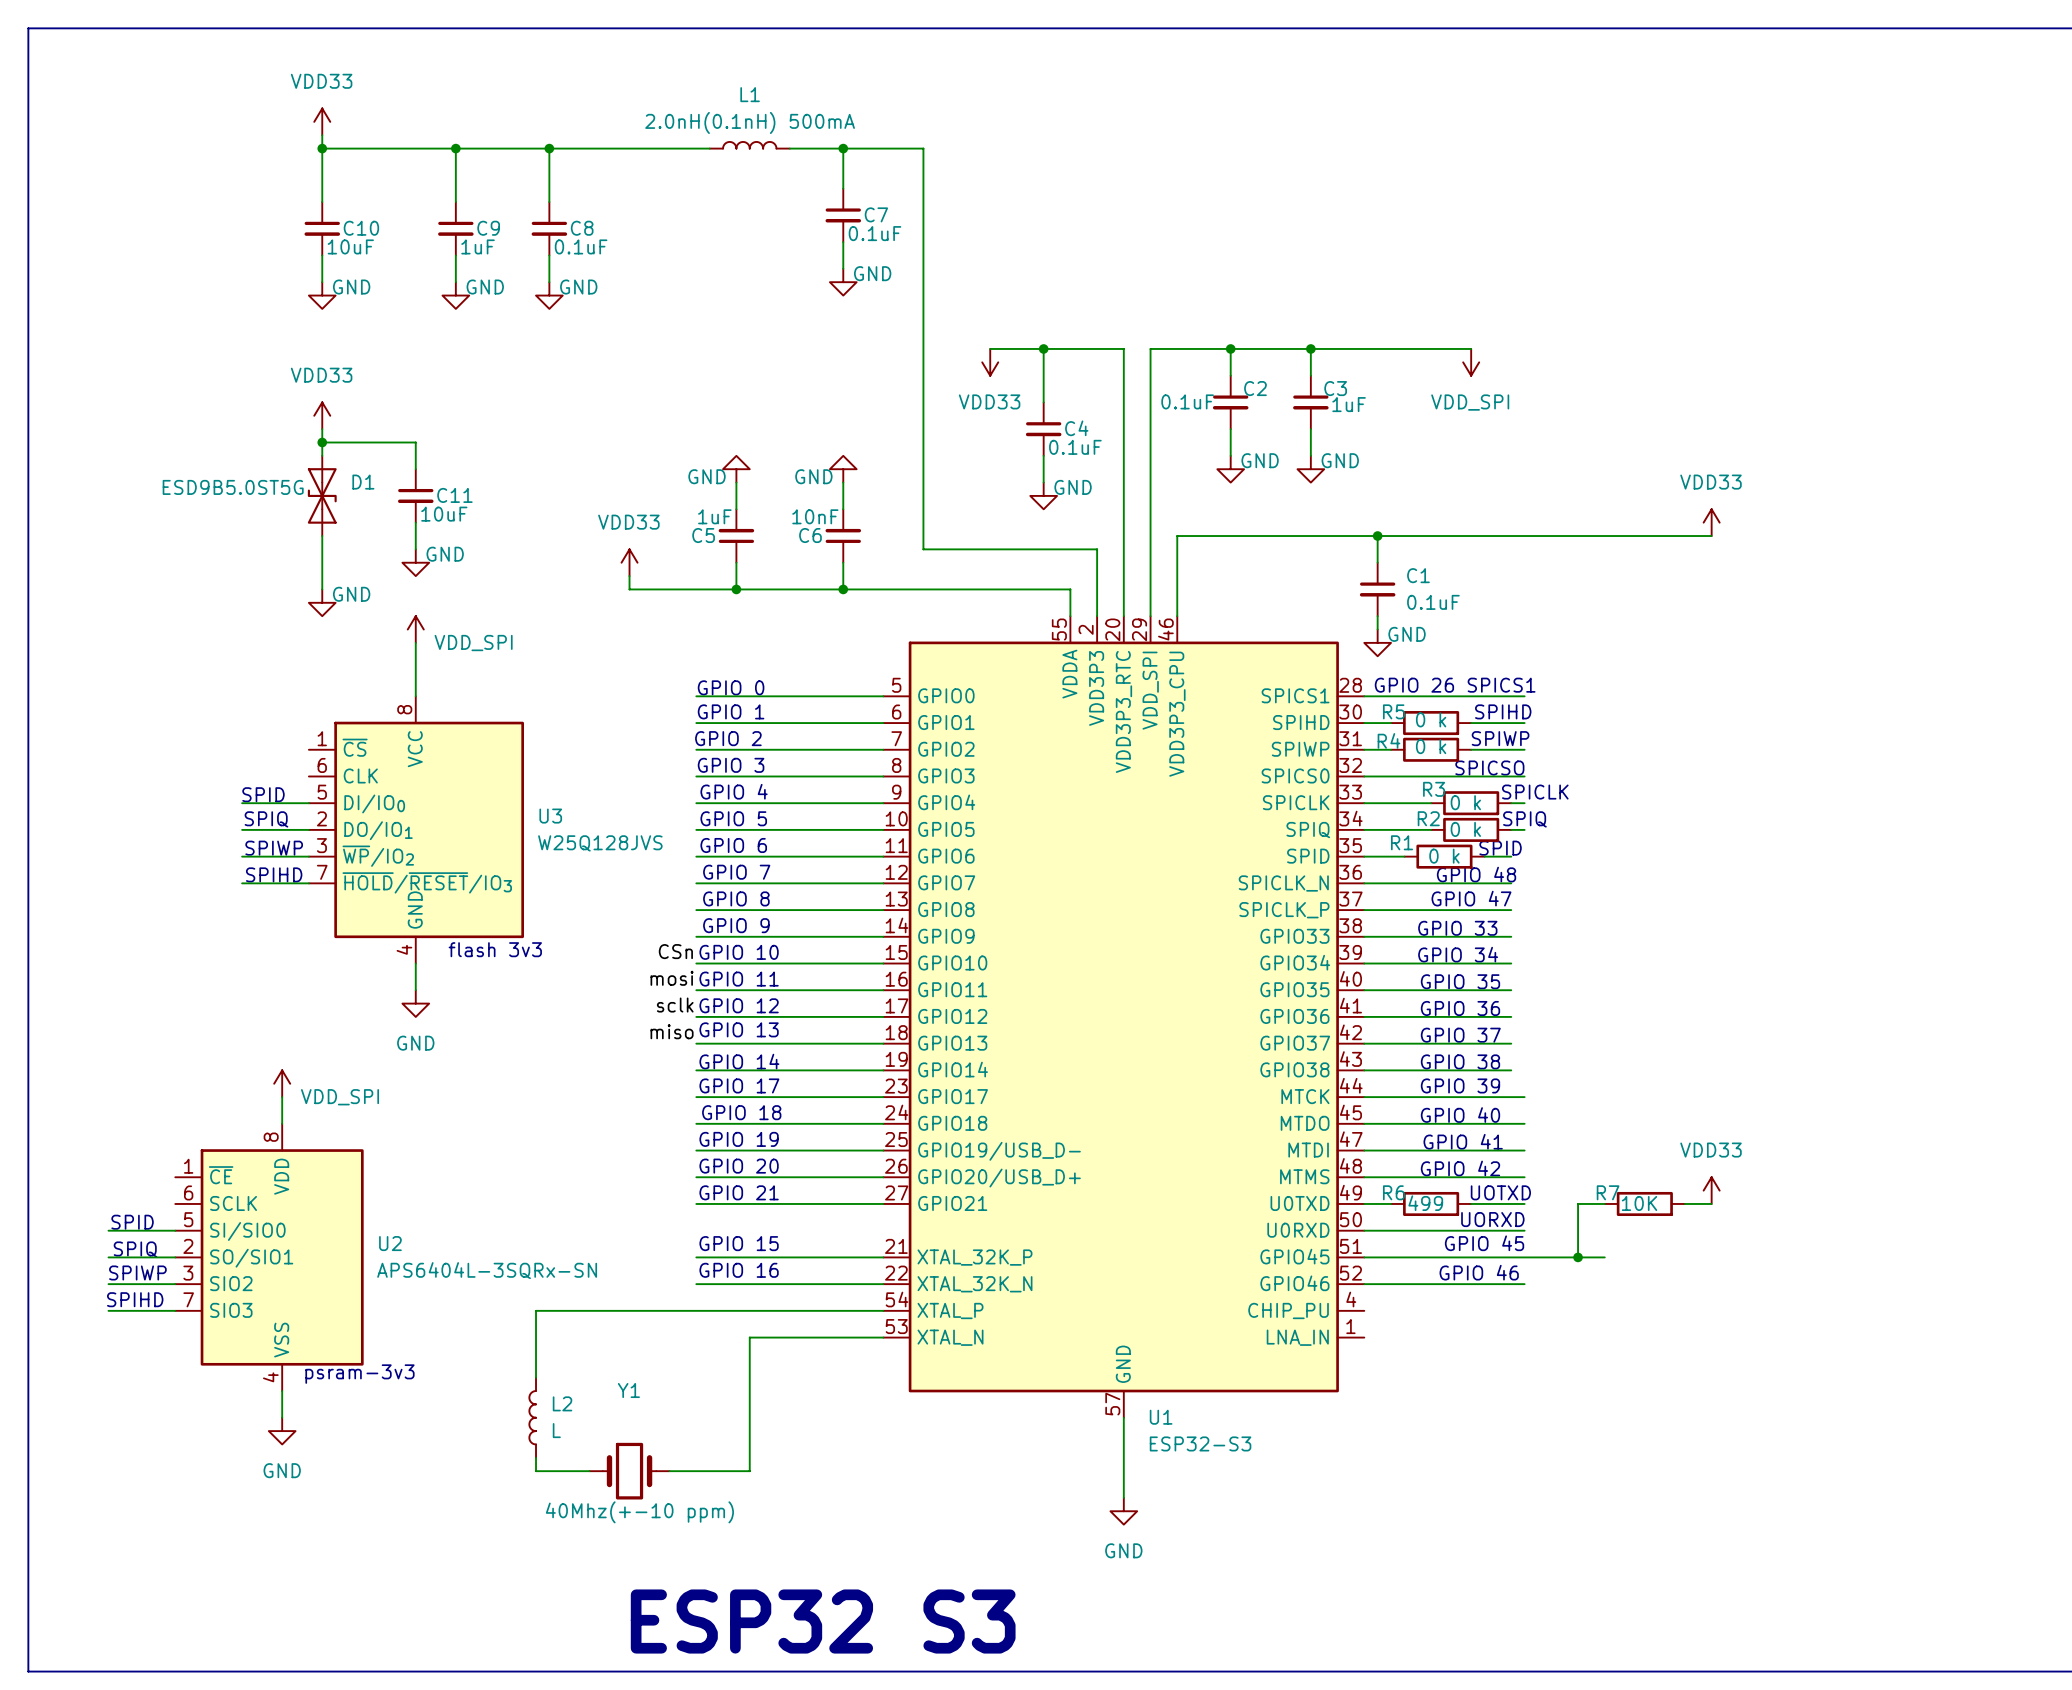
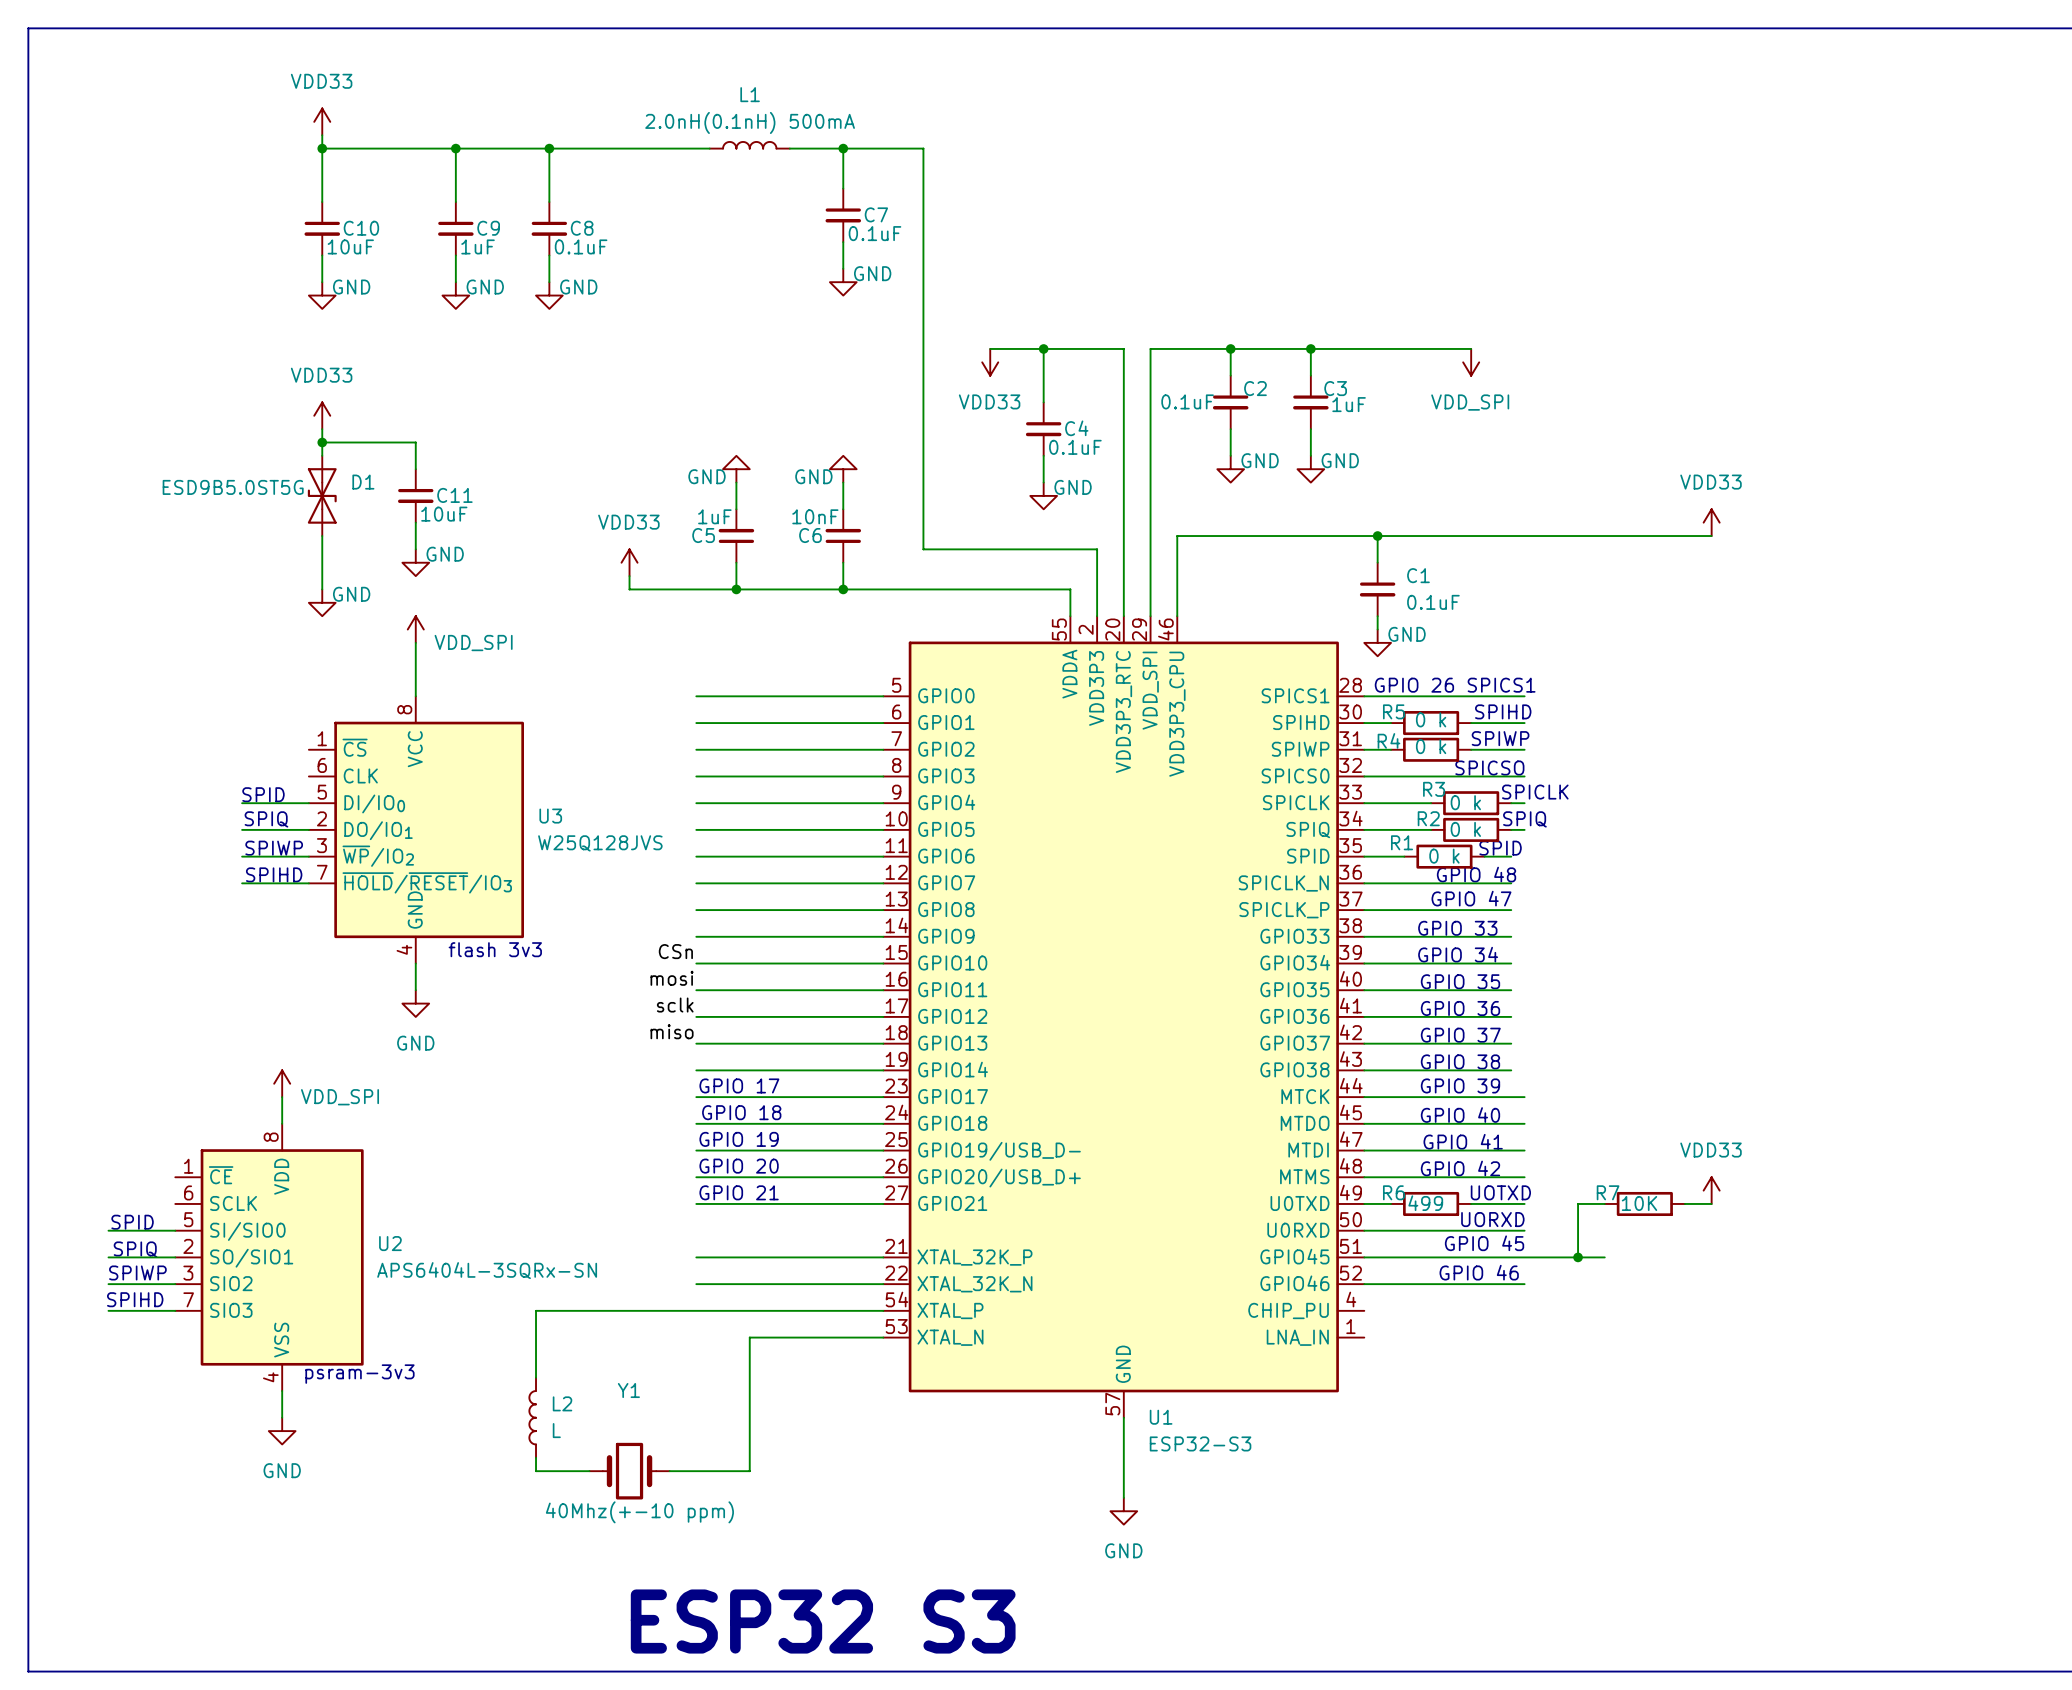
text: GPIO 0 (731, 687) -> none
text: GPIO 1 (731, 711) -> none
text: GPIO 2 (728, 738) -> none
text: GPIO 3 (731, 765) -> none
text: GPIO 4 (734, 791) -> none
text: GPIO 5 (733, 818) -> none
text: GPIO 6 (733, 845) -> none
text: GPIO 7 (736, 872) -> none
text: GPIO 8 (736, 898) -> none
text: GPIO 9 (736, 925) -> none
text: GPIO 10 (739, 952) -> none
text: GPIO 11 (739, 979) -> none
text: GPIO 12 (739, 1005) -> none
text: GPIO 13 (739, 1029) -> none
text: GPIO 14 (739, 1061) -> none
text: GPIO 15 (739, 1243) -> none
text: GPIO 16 (739, 1270) -> none

